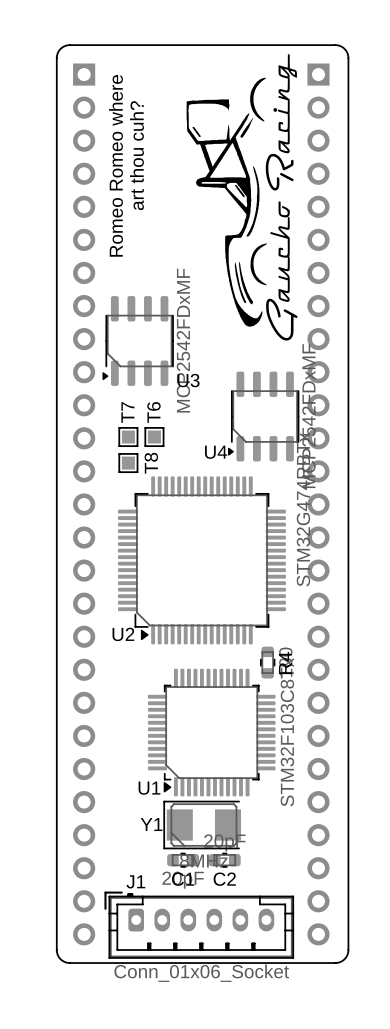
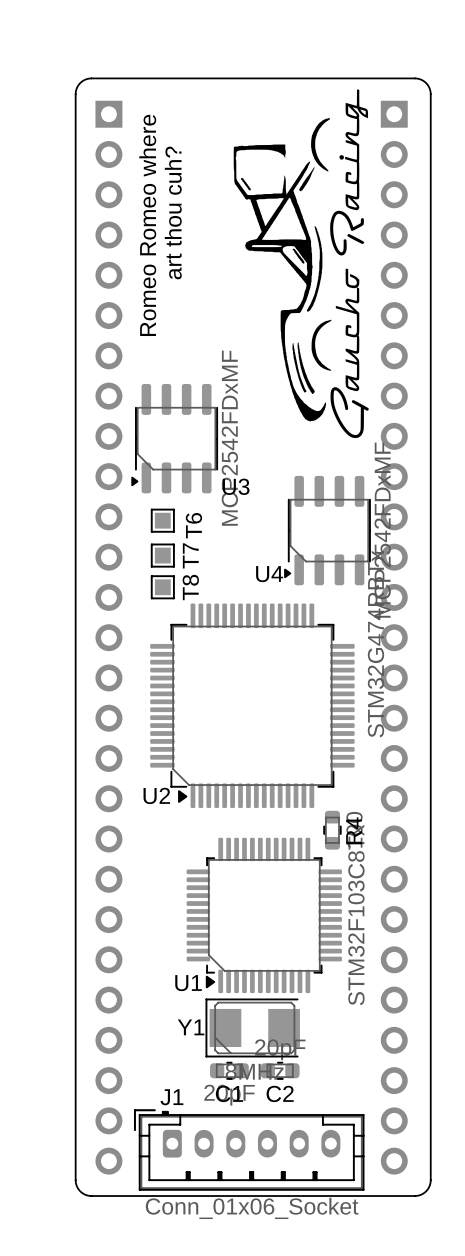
T7 name position: T7 (127, 412) -> T7 (190, 555)
T6 position: (154, 437) -> (162, 520)

